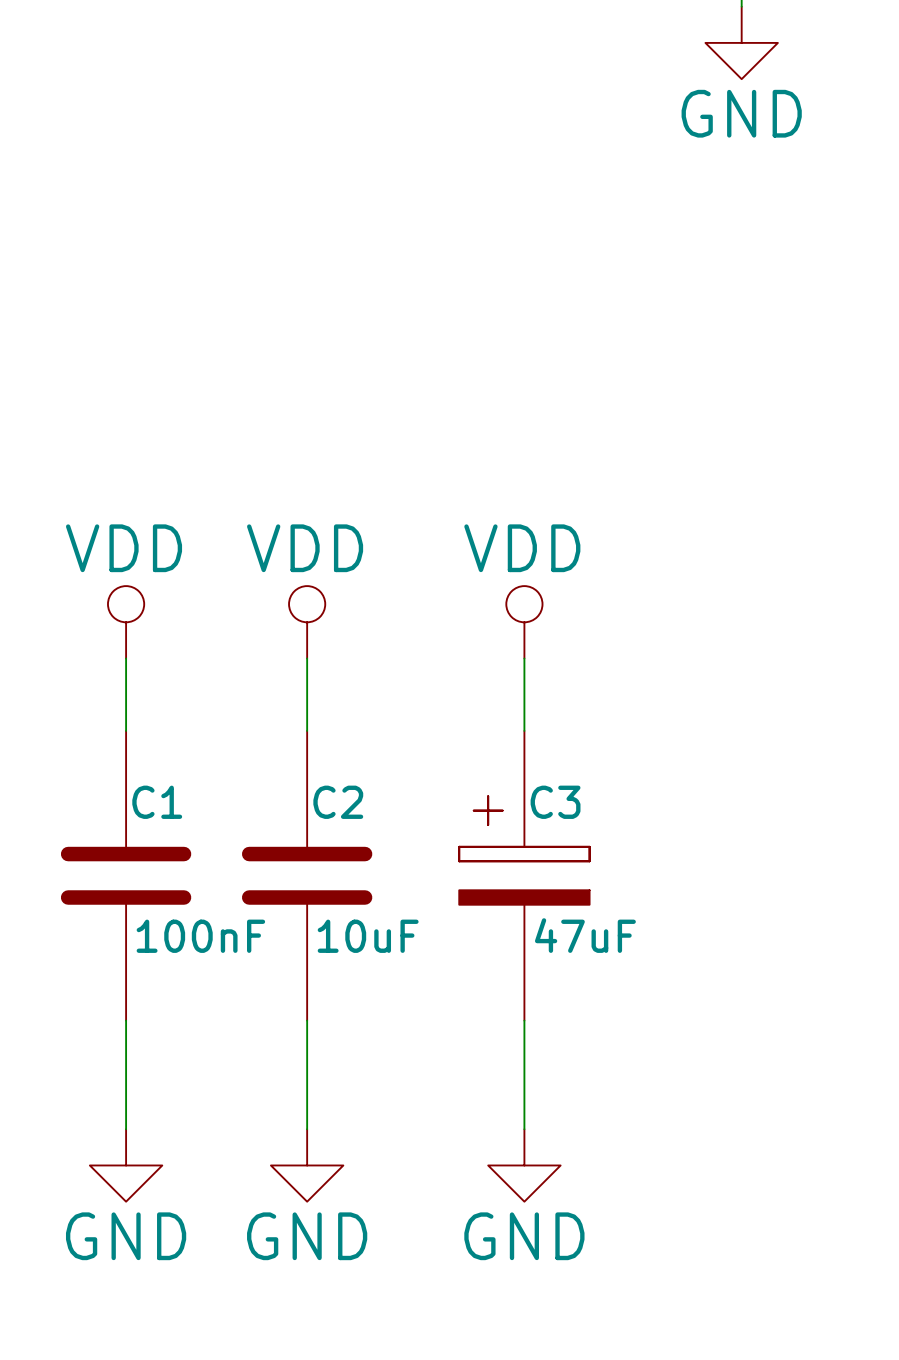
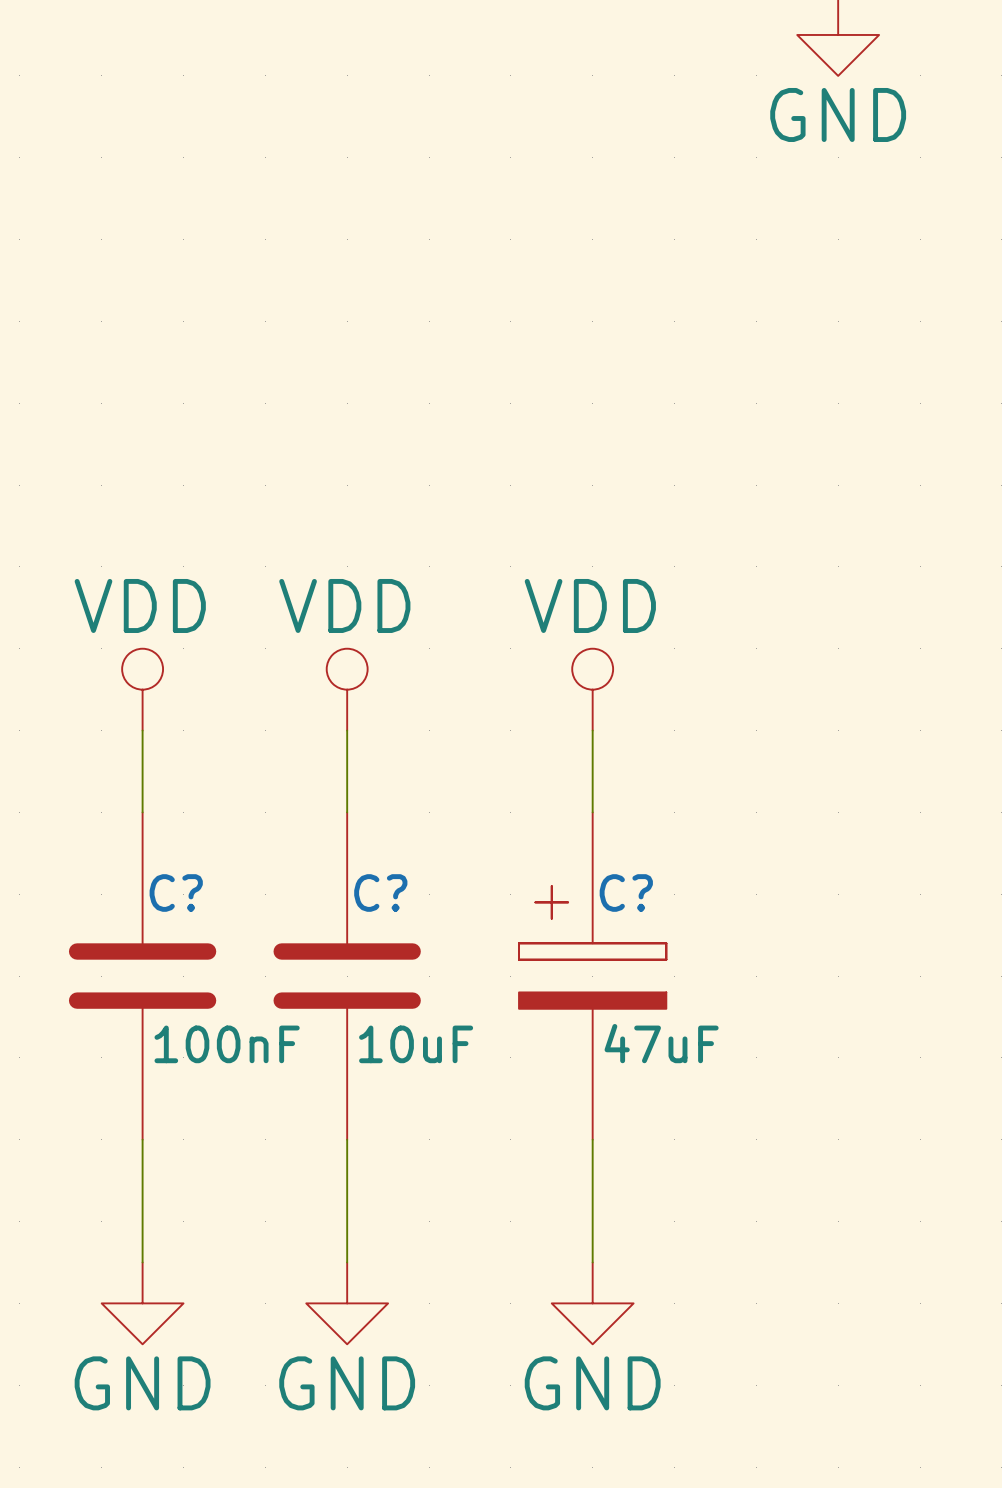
C1 name: C1 (157, 802) -> C? (176, 893)
C2 name: C2 (338, 802) -> C? (380, 893)
C3 name: C3 (555, 802) -> C? (626, 893)

